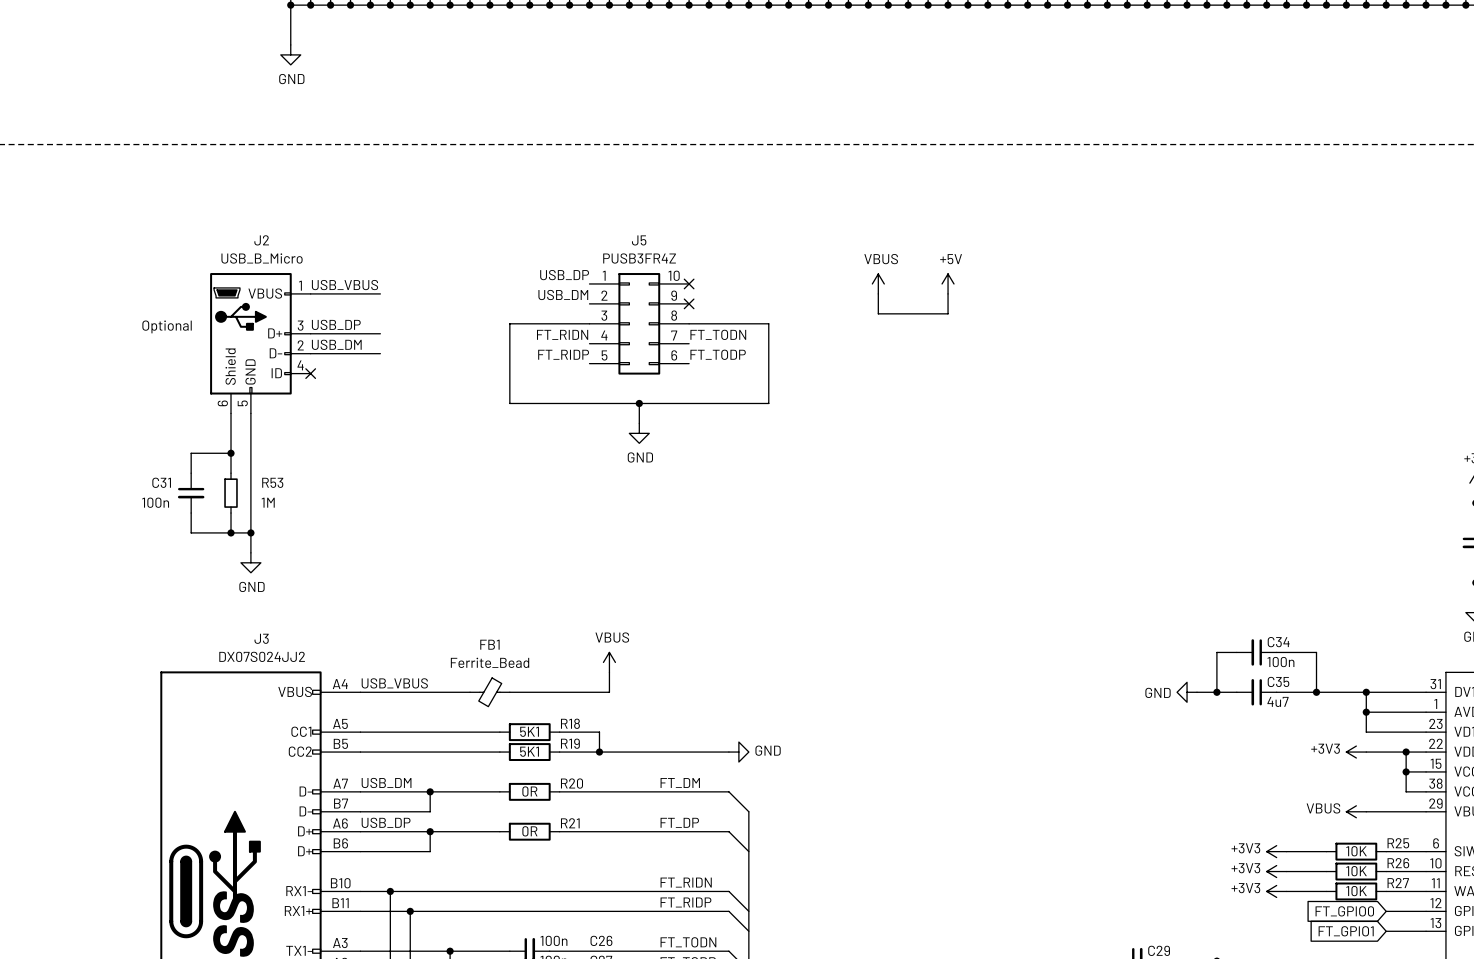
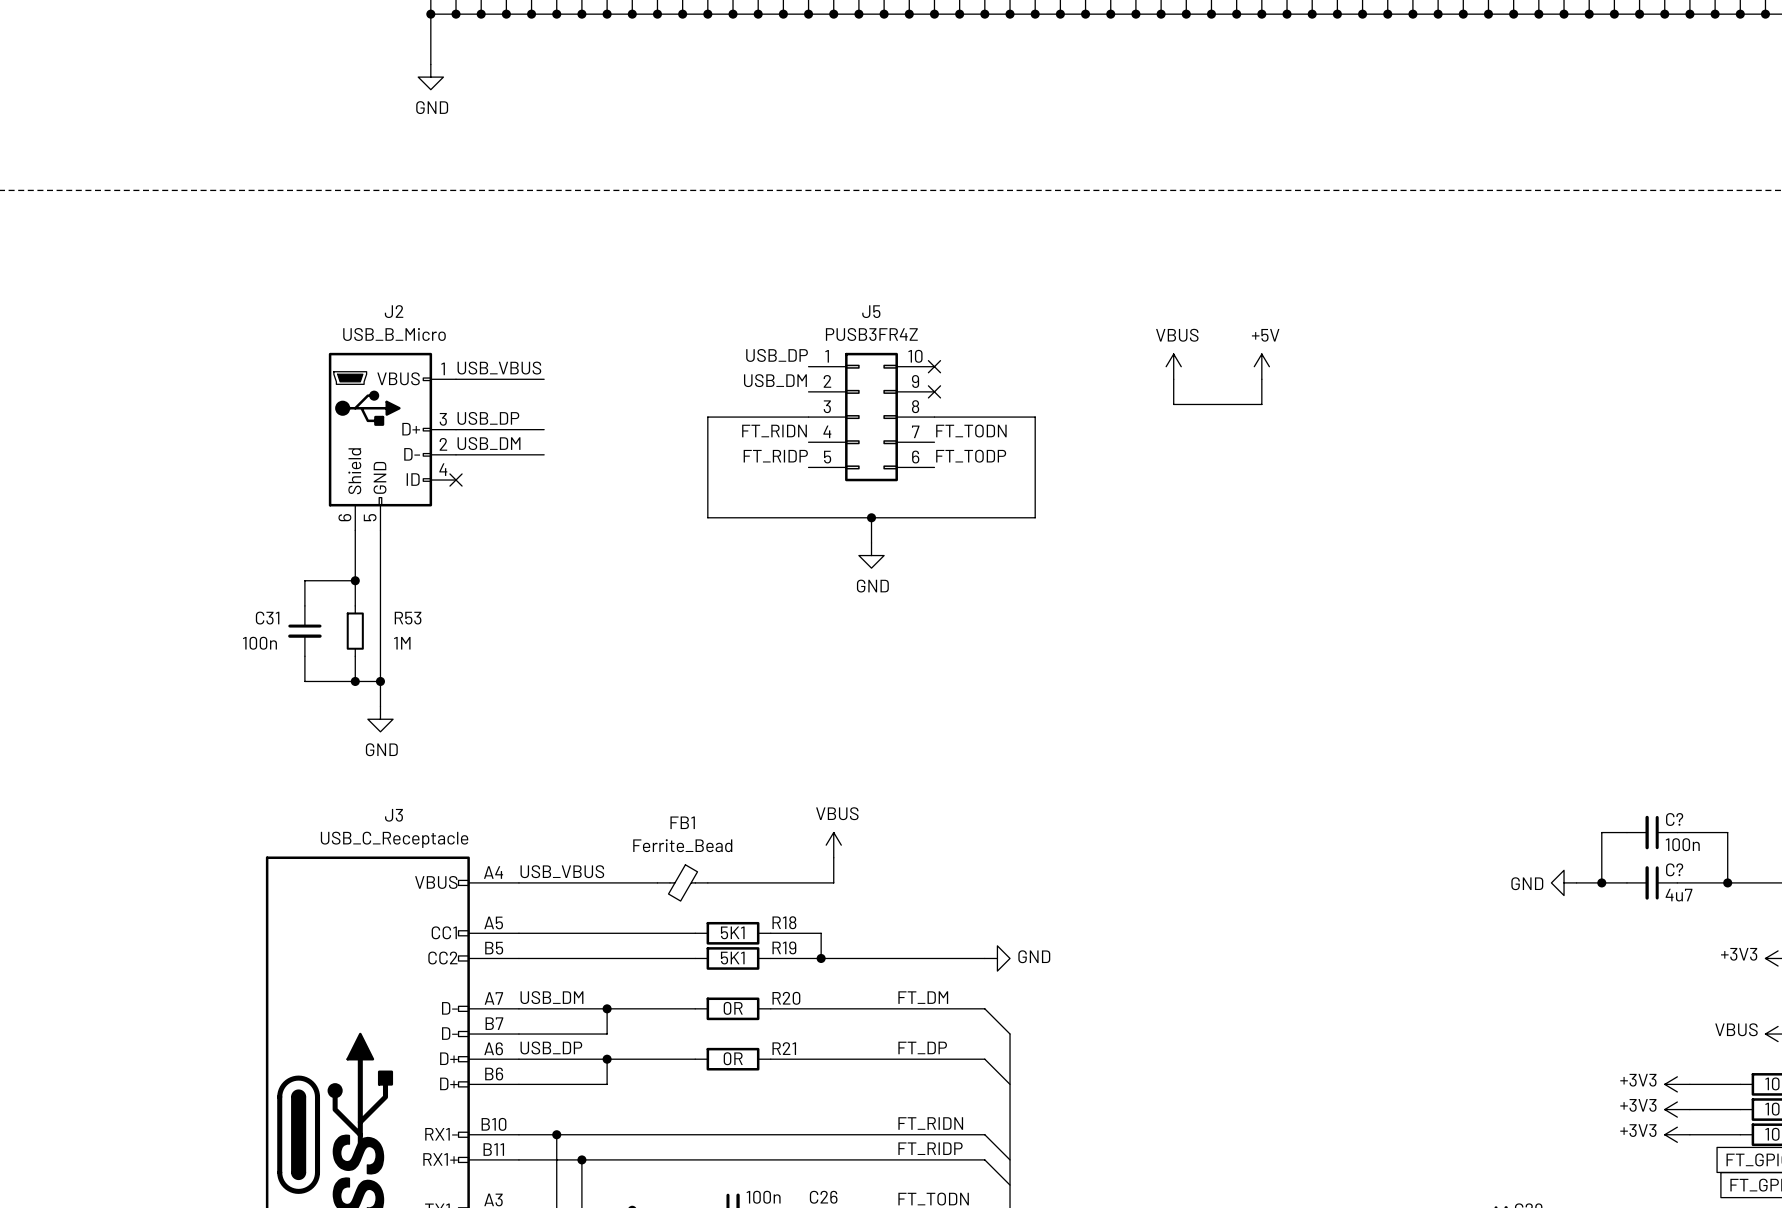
text: Optional (167, 326) -> none
C34 name: C34 (1278, 642) -> C? (1674, 819)
J3 value: DX07S024JJ2 (262, 656) -> USB_C_Receptacle (394, 839)
C35 name: C35 (1278, 681) -> C? (1674, 869)

